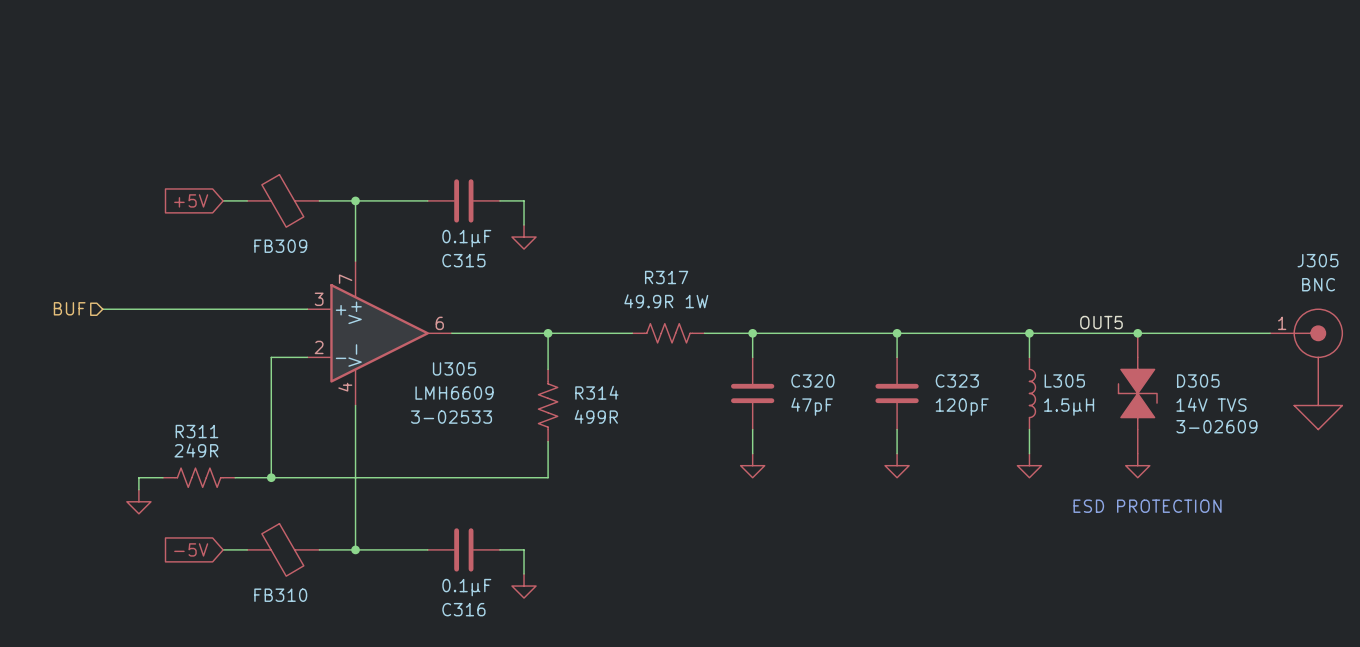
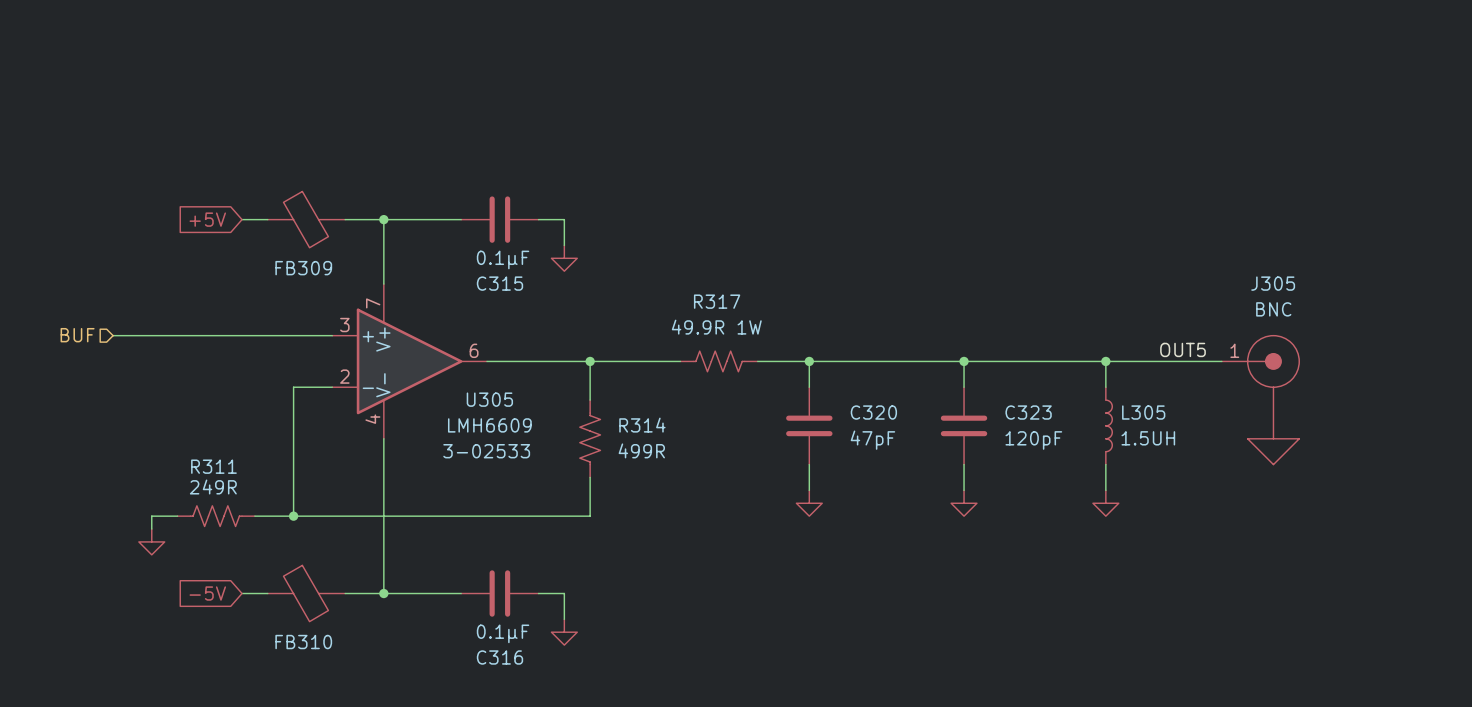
wire: (1137, 333) (1270, 333) -> none
junction: (1137, 333) -> none
J305 position: (1306, 369) -> (1260, 400)
D305: 14V TVS (1137, 393) -> none
L305 value: 1.5μH (1069, 407) -> 1.5UH (1148, 438)
power symbol: (1137, 465) -> none
text: ESD PROTECTION (1147, 506) -> none

